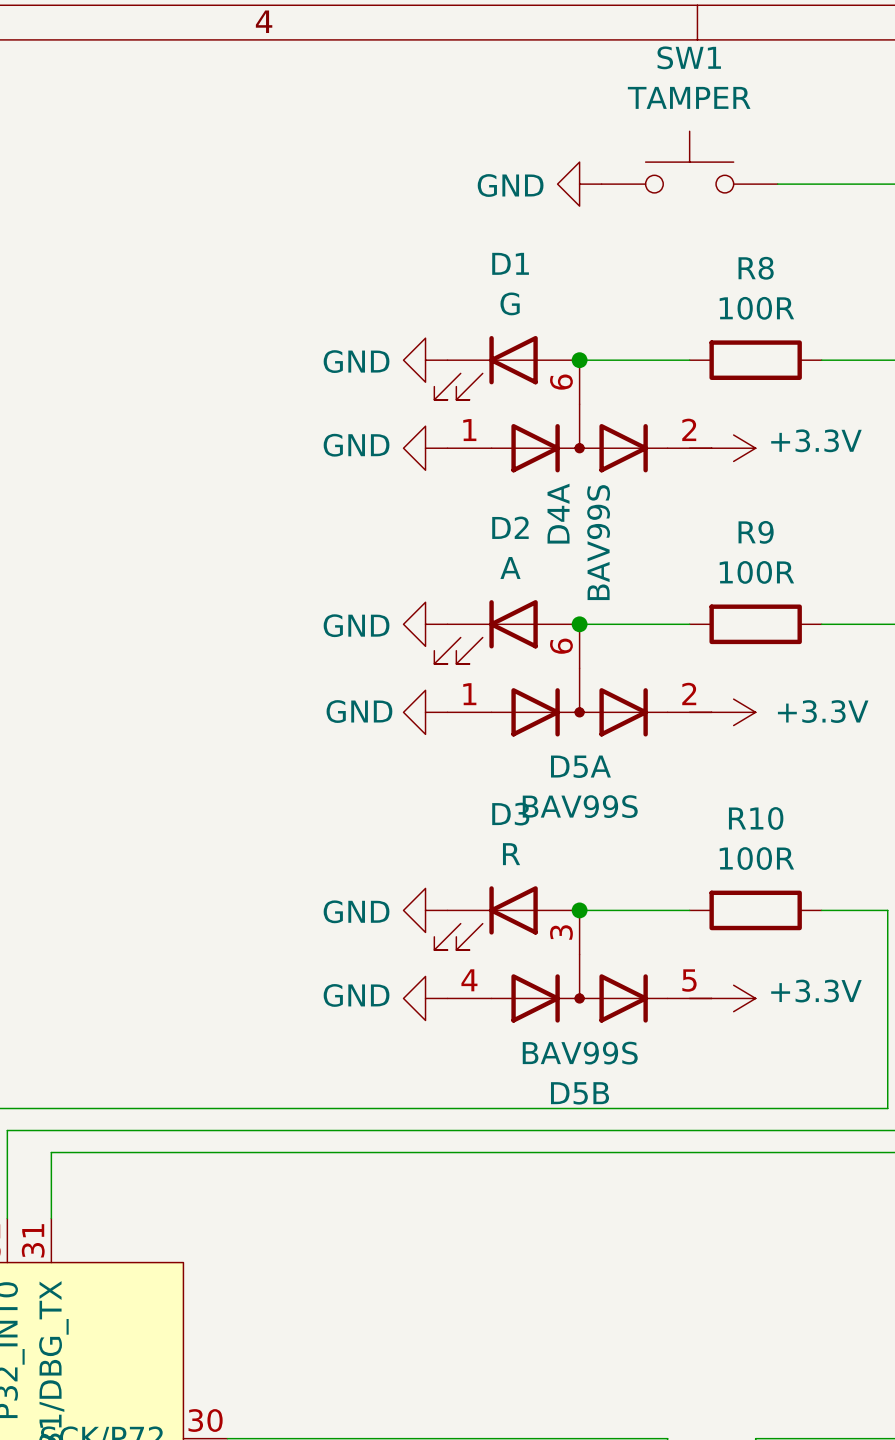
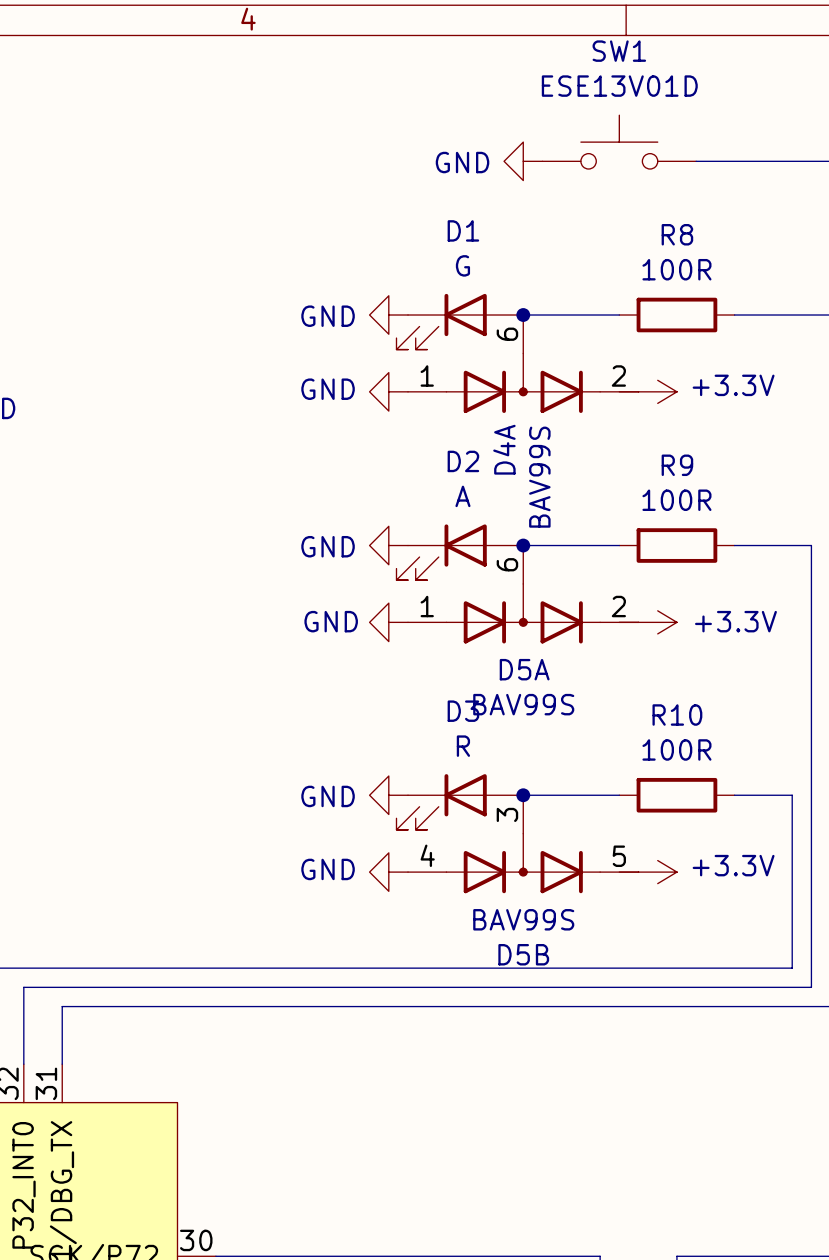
SW1 value: TAMPER (689, 97) -> ESE13V01D (619, 86)

